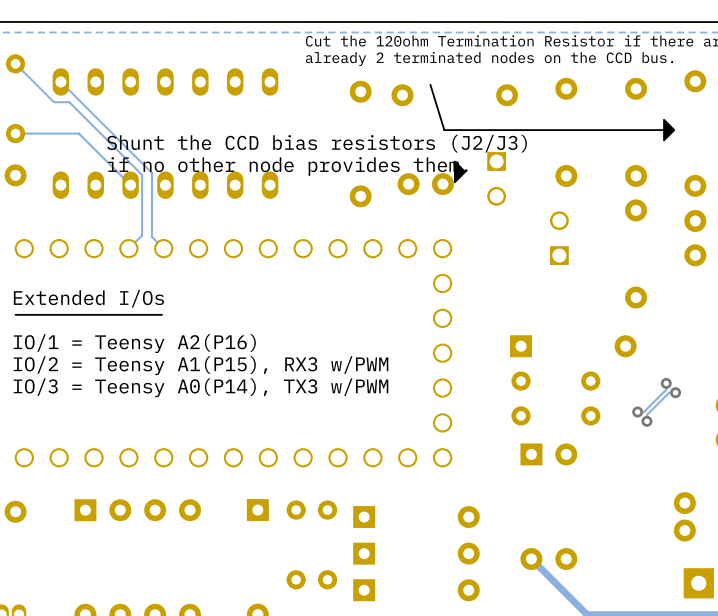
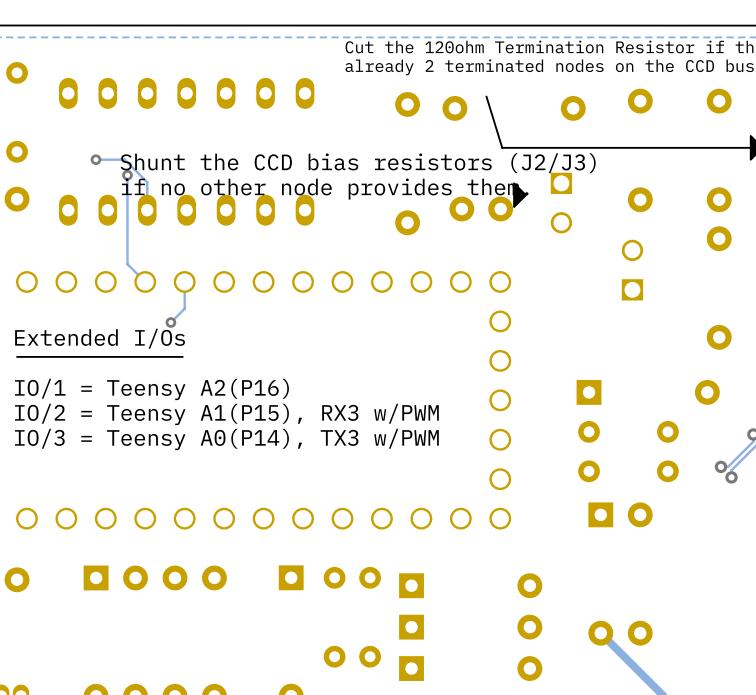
track: (15, 63) (53, 102) (69, 102) (142, 174) (142, 235) (128, 248) -> (127, 175) (127, 264) (145, 281)
track: (60, 81) (152, 173) (152, 236) (163, 248) -> (170, 322) (184, 308) (184, 281)
track: (15, 133) (79, 133) (130, 185) -> (95, 159) (124, 159) (147, 182) (147, 210)
via: none -> (95, 159)
via: none -> (127, 175)
via: none -> (170, 322)

